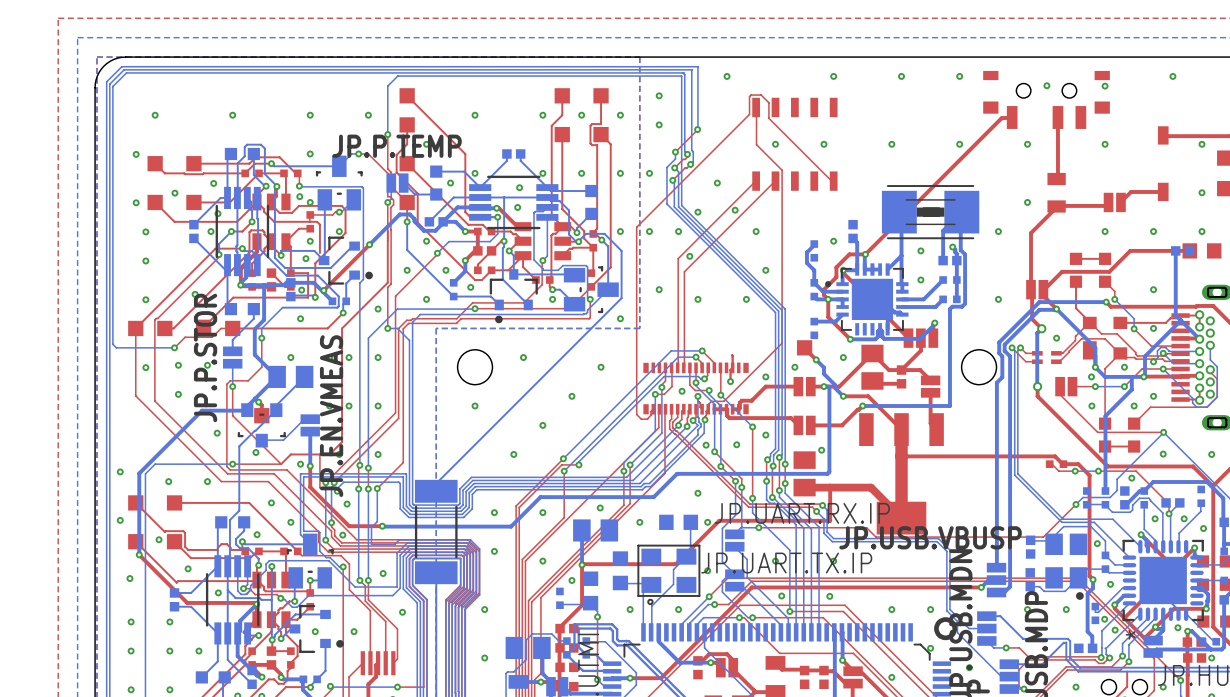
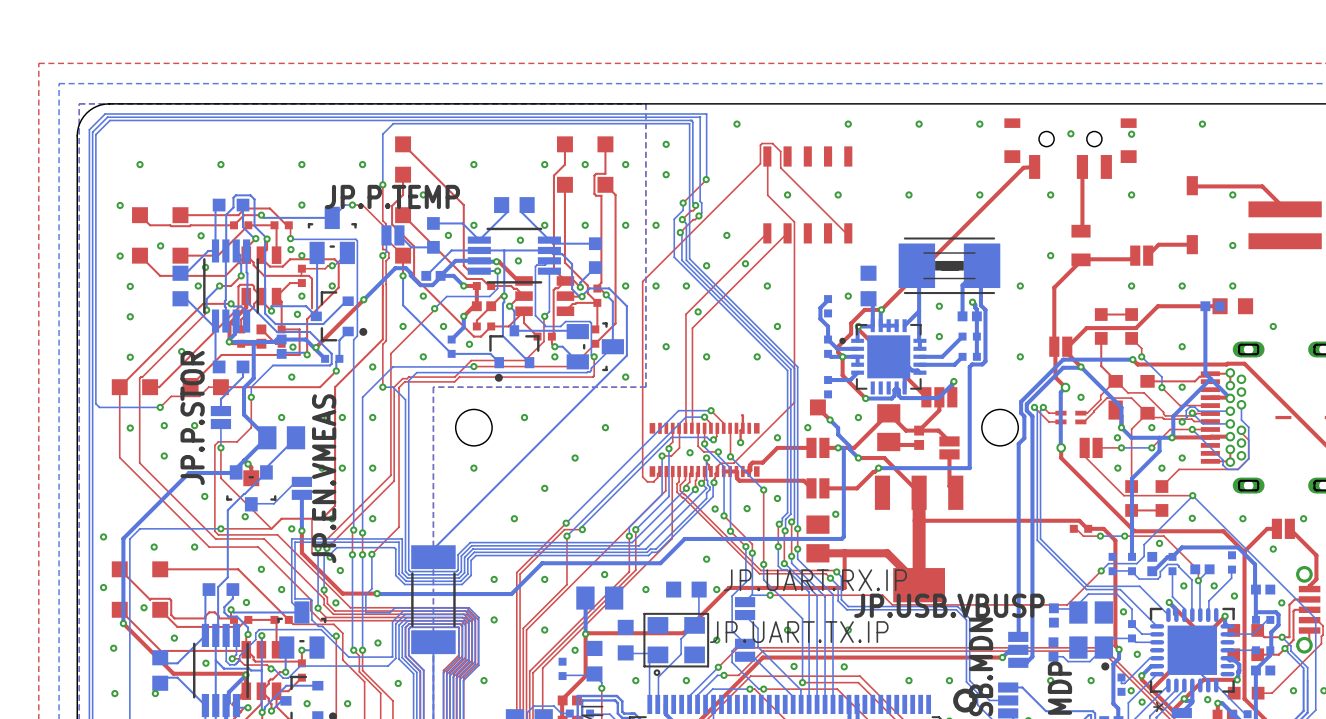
part footprint: [502, 149, 526, 159] -> [494, 197, 535, 214]
part footprint: [189, 219, 199, 244] -> [172, 265, 189, 307]
part footprint: [848, 219, 858, 244] -> [860, 265, 877, 307]
part footprint: [169, 588, 180, 612] -> [152, 650, 169, 691]

